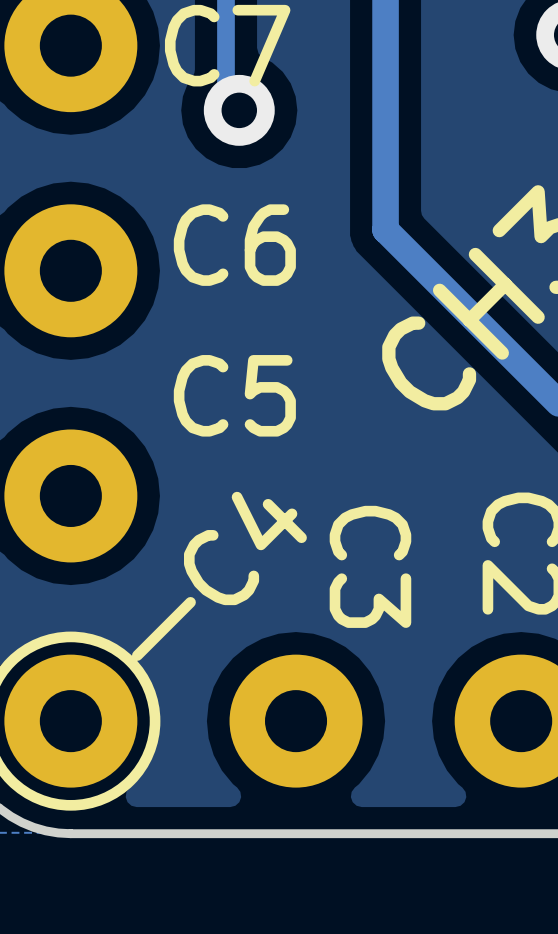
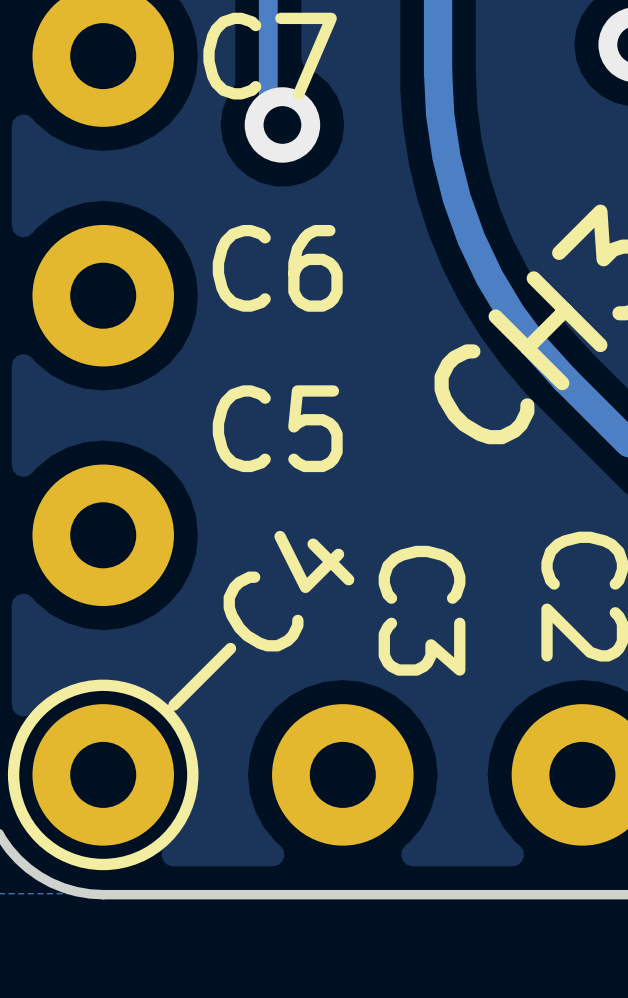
track: (385, 60) (385, 230) (505, 349) -> (438, 72) (440, 114) (446, 157) (456, 198) (471, 238) (489, 277) (511, 313) (536, 348) (565, 379)

